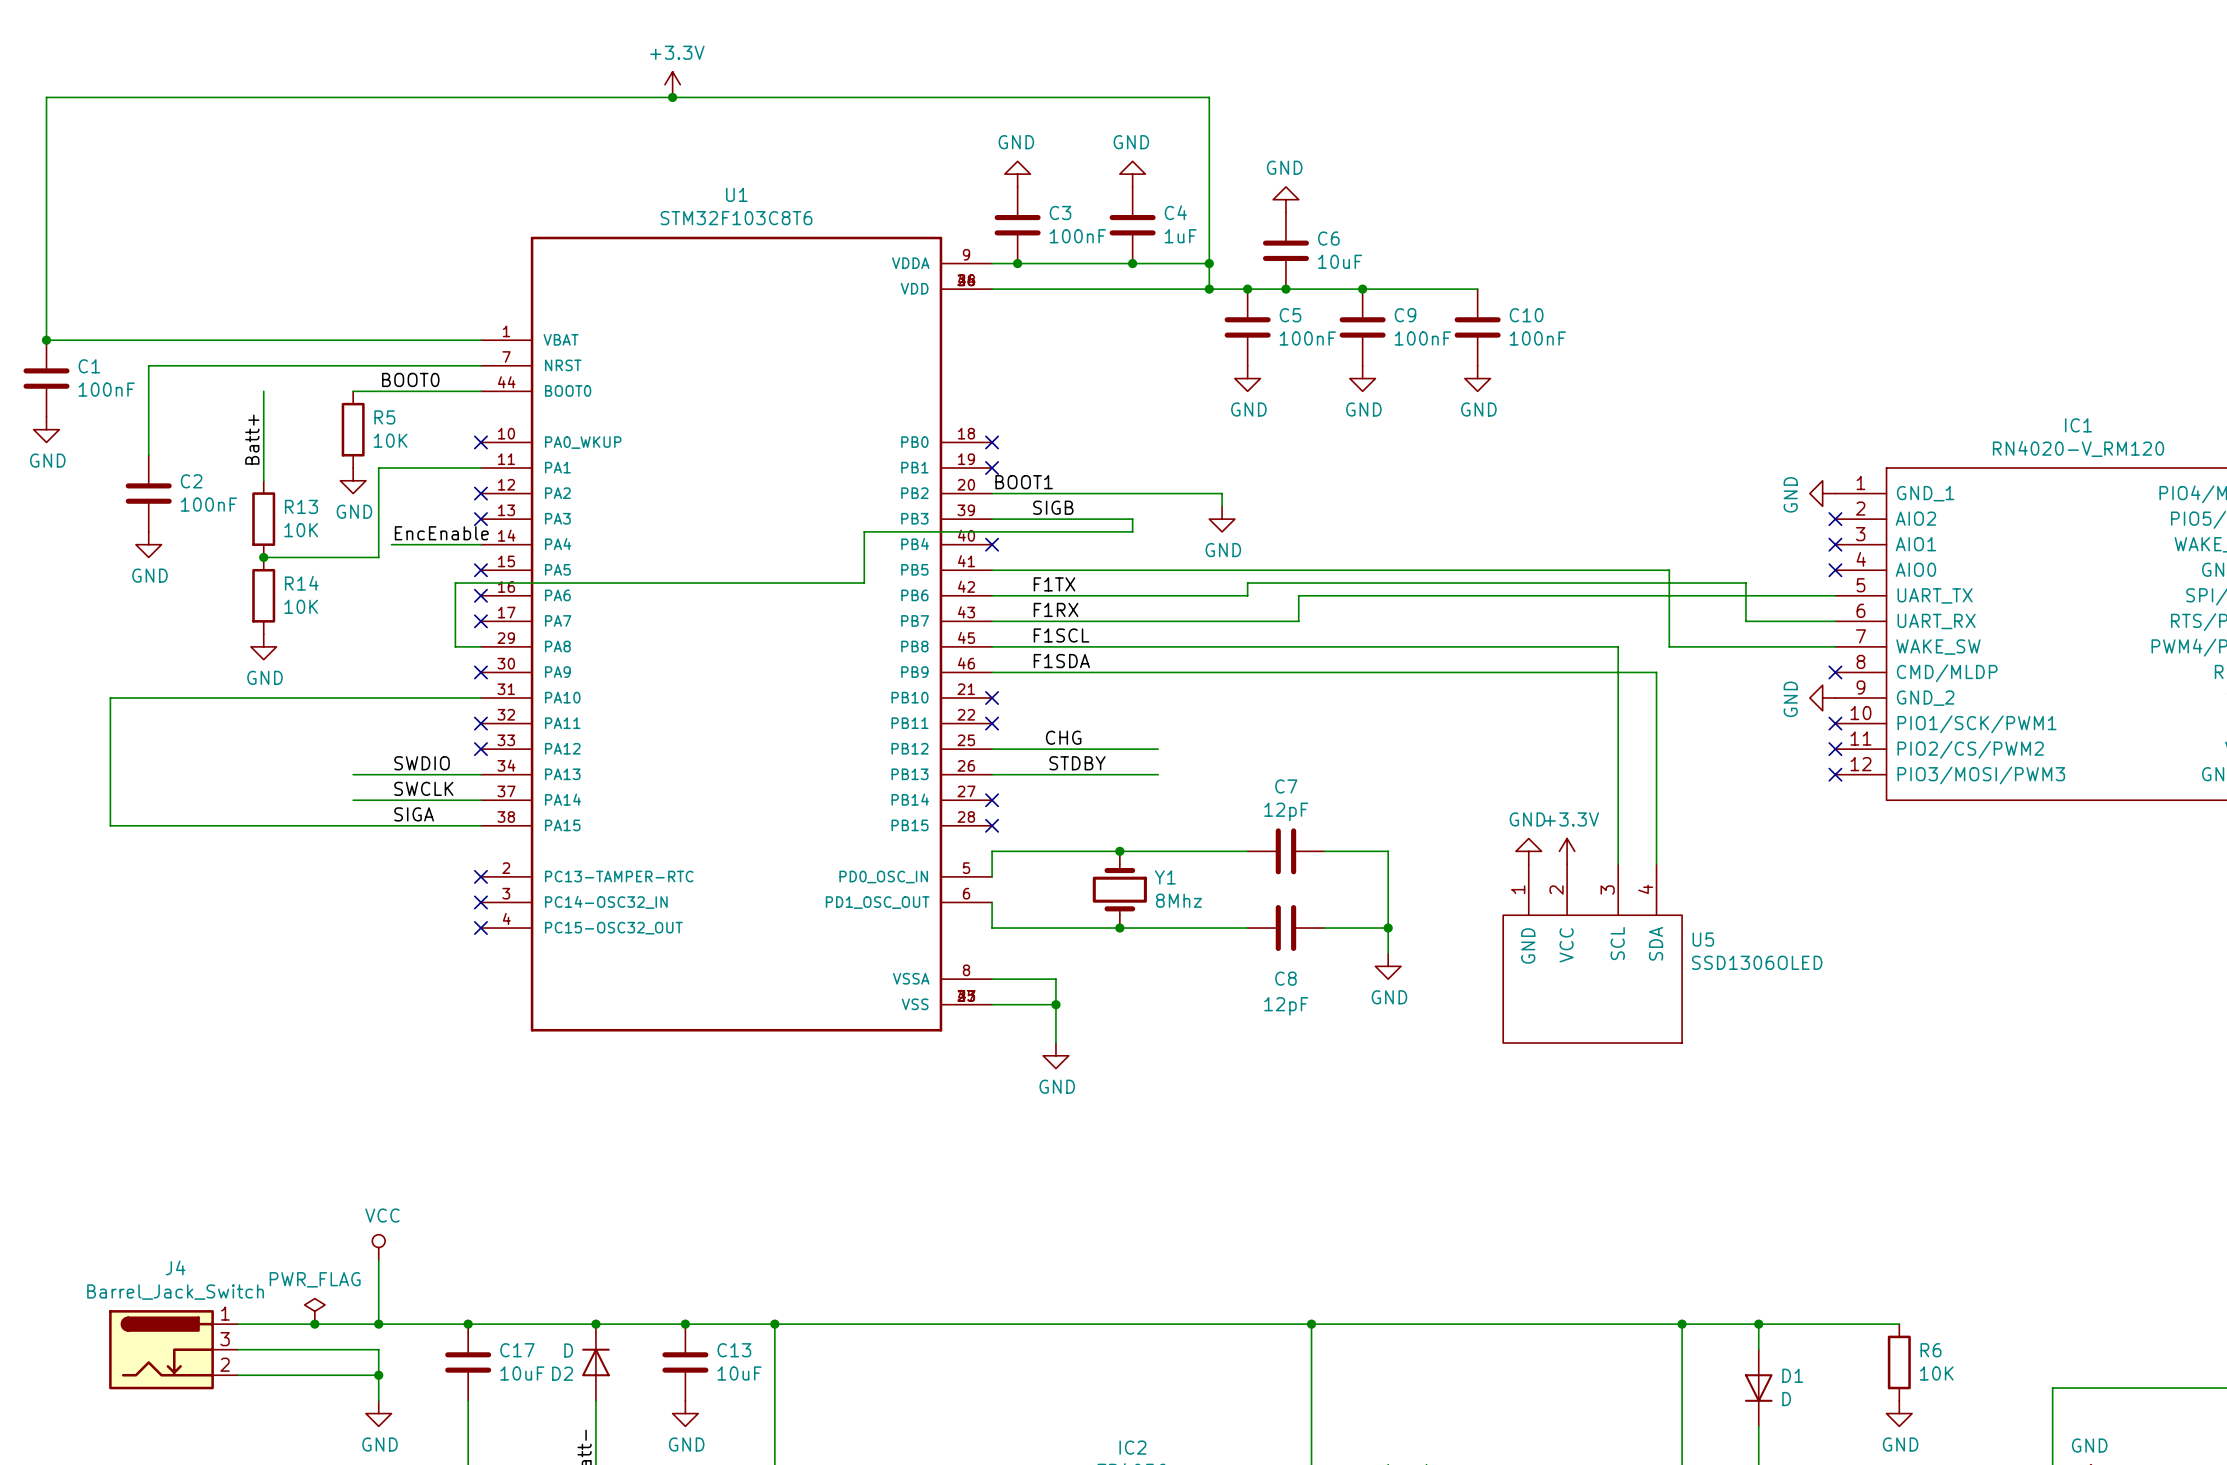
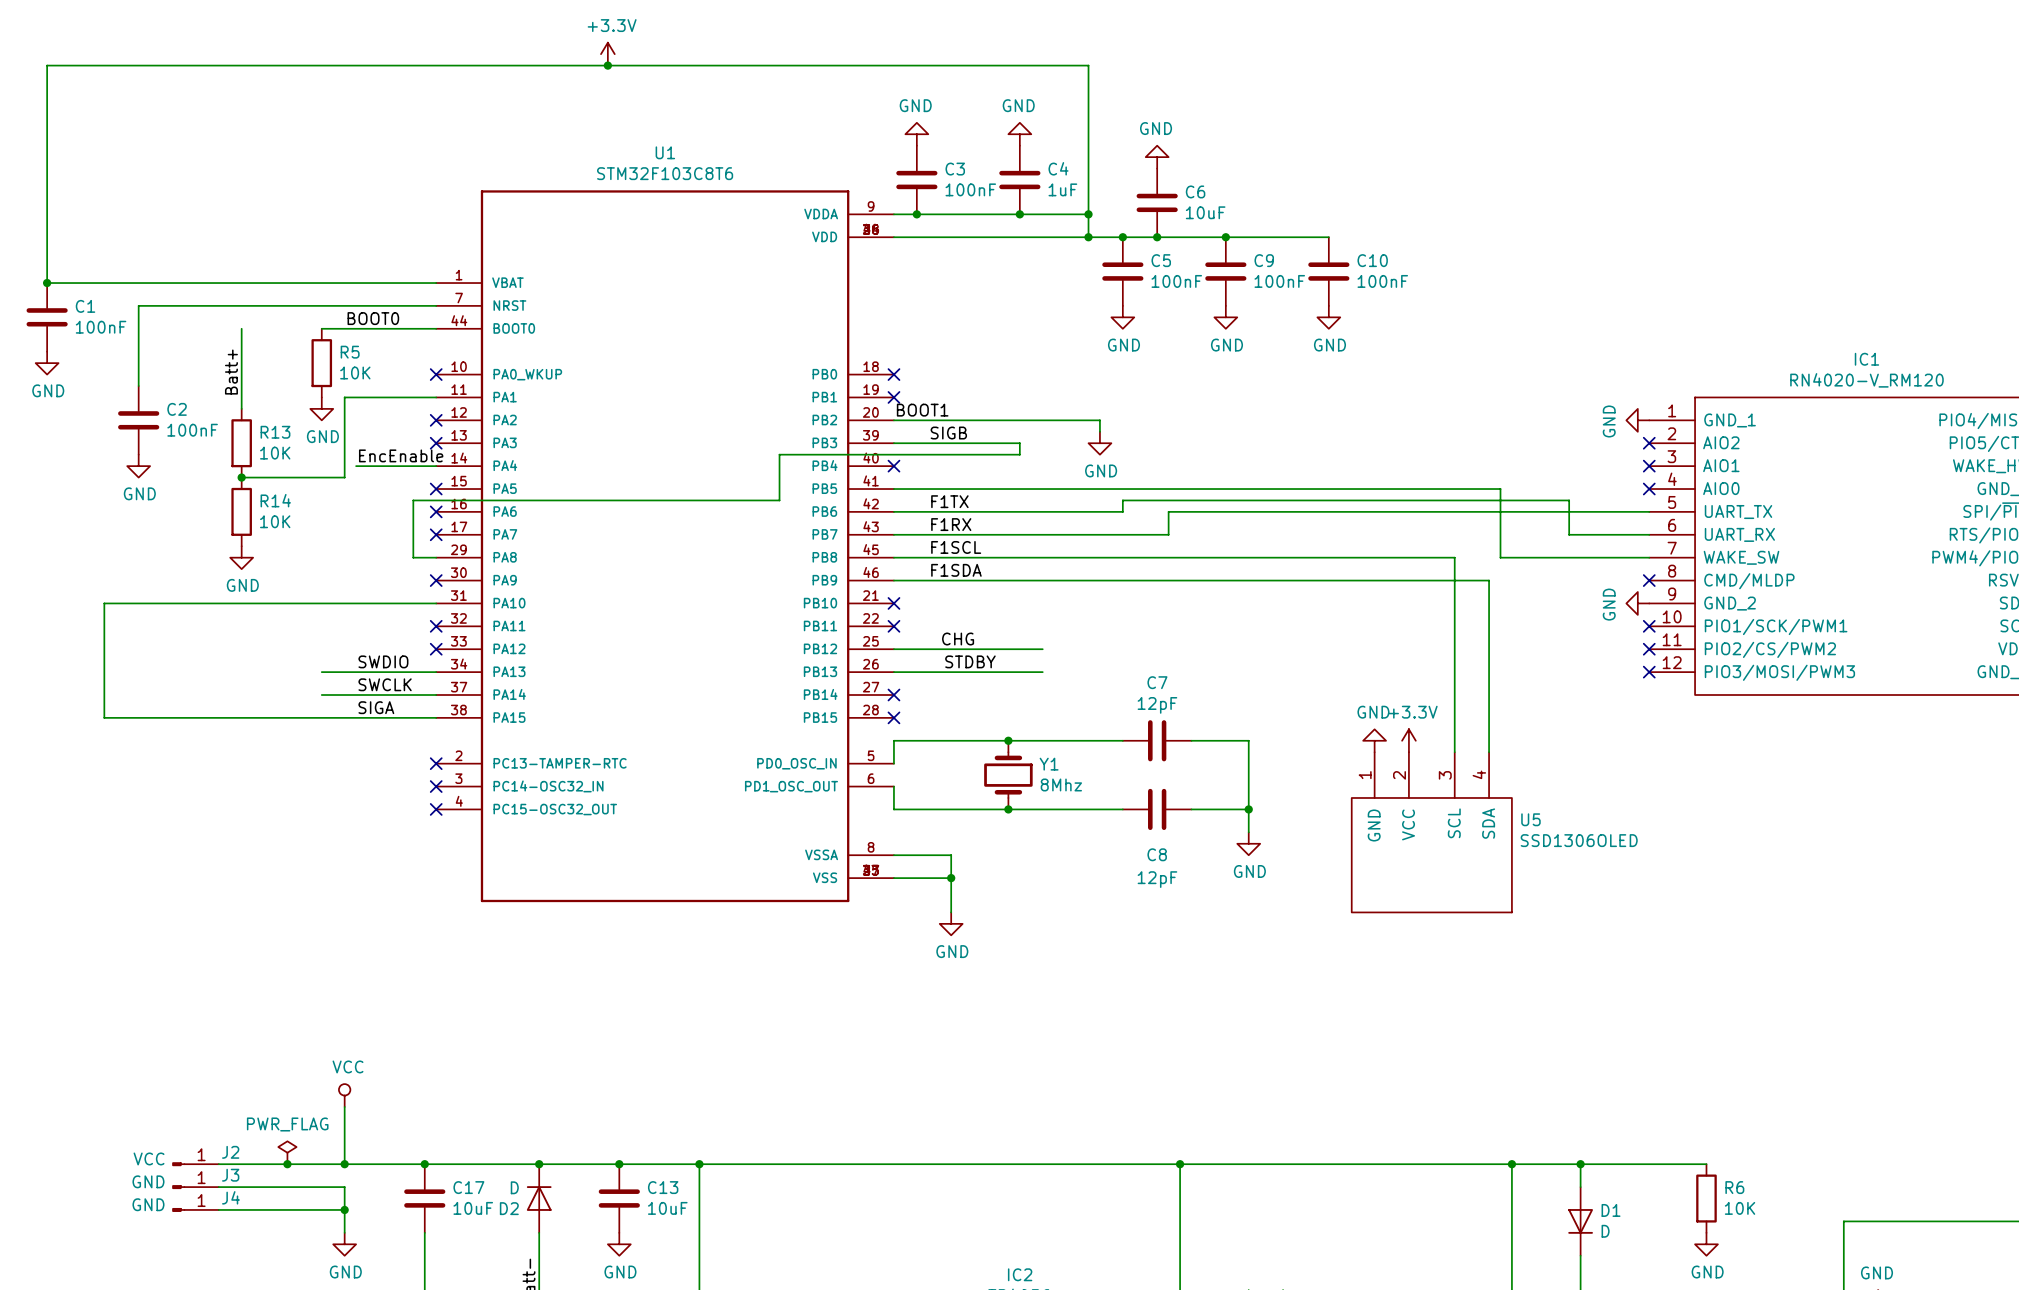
J4 name position: J4 (175, 1267) -> J4 (230, 1197)
J4 value: Barrel_Jack_Switch (175, 1292) -> GND (148, 1204)
J4 symbol: [109, 1310, 239, 1390] -> [172, 1208, 219, 1212]
J2: none -> VCC (195, 1164)
J3: none -> GND (195, 1187)

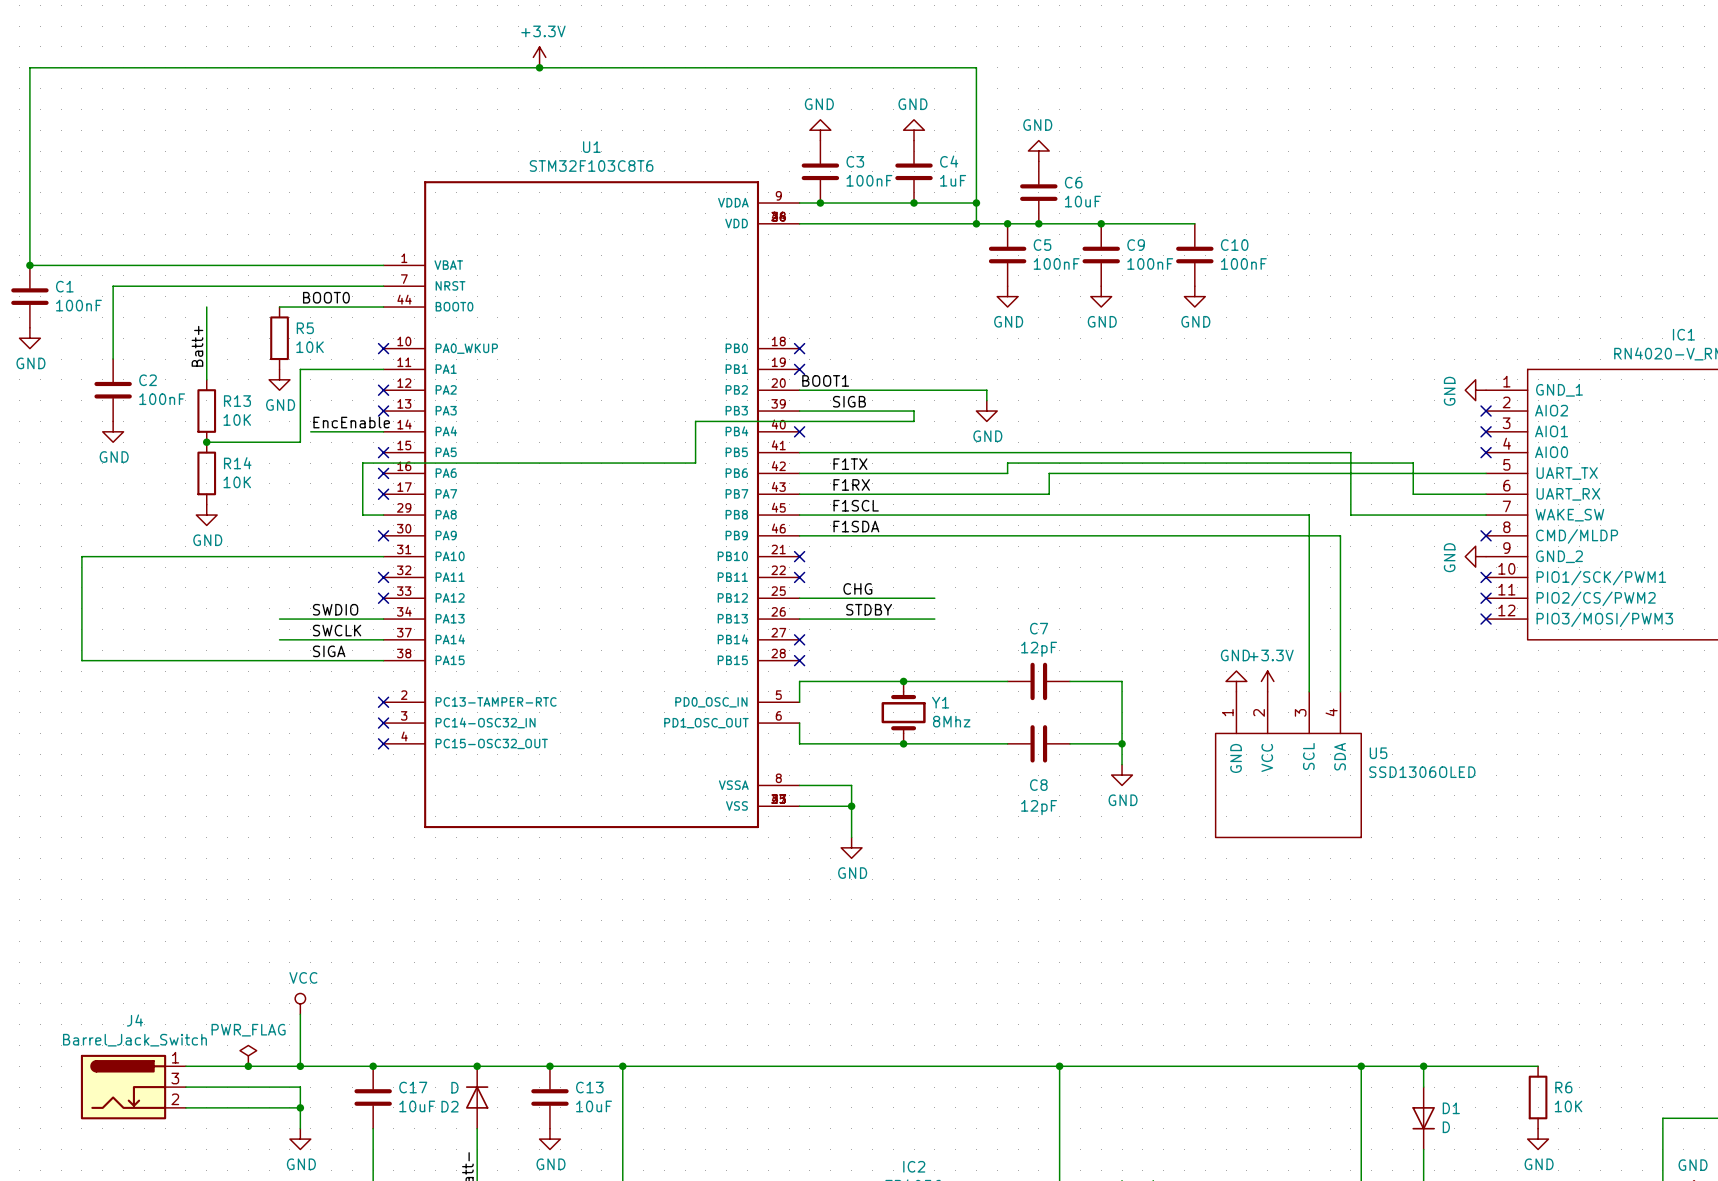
J2: VCC (195, 1164) -> none
J3: GND (195, 1187) -> none
J4 name position: J4 (230, 1197) -> J4 (134, 1020)
J4 value: GND (148, 1204) -> Barrel_Jack_Switch (134, 1040)
J4 symbol: [172, 1208, 219, 1212] -> [80, 1054, 186, 1120]

